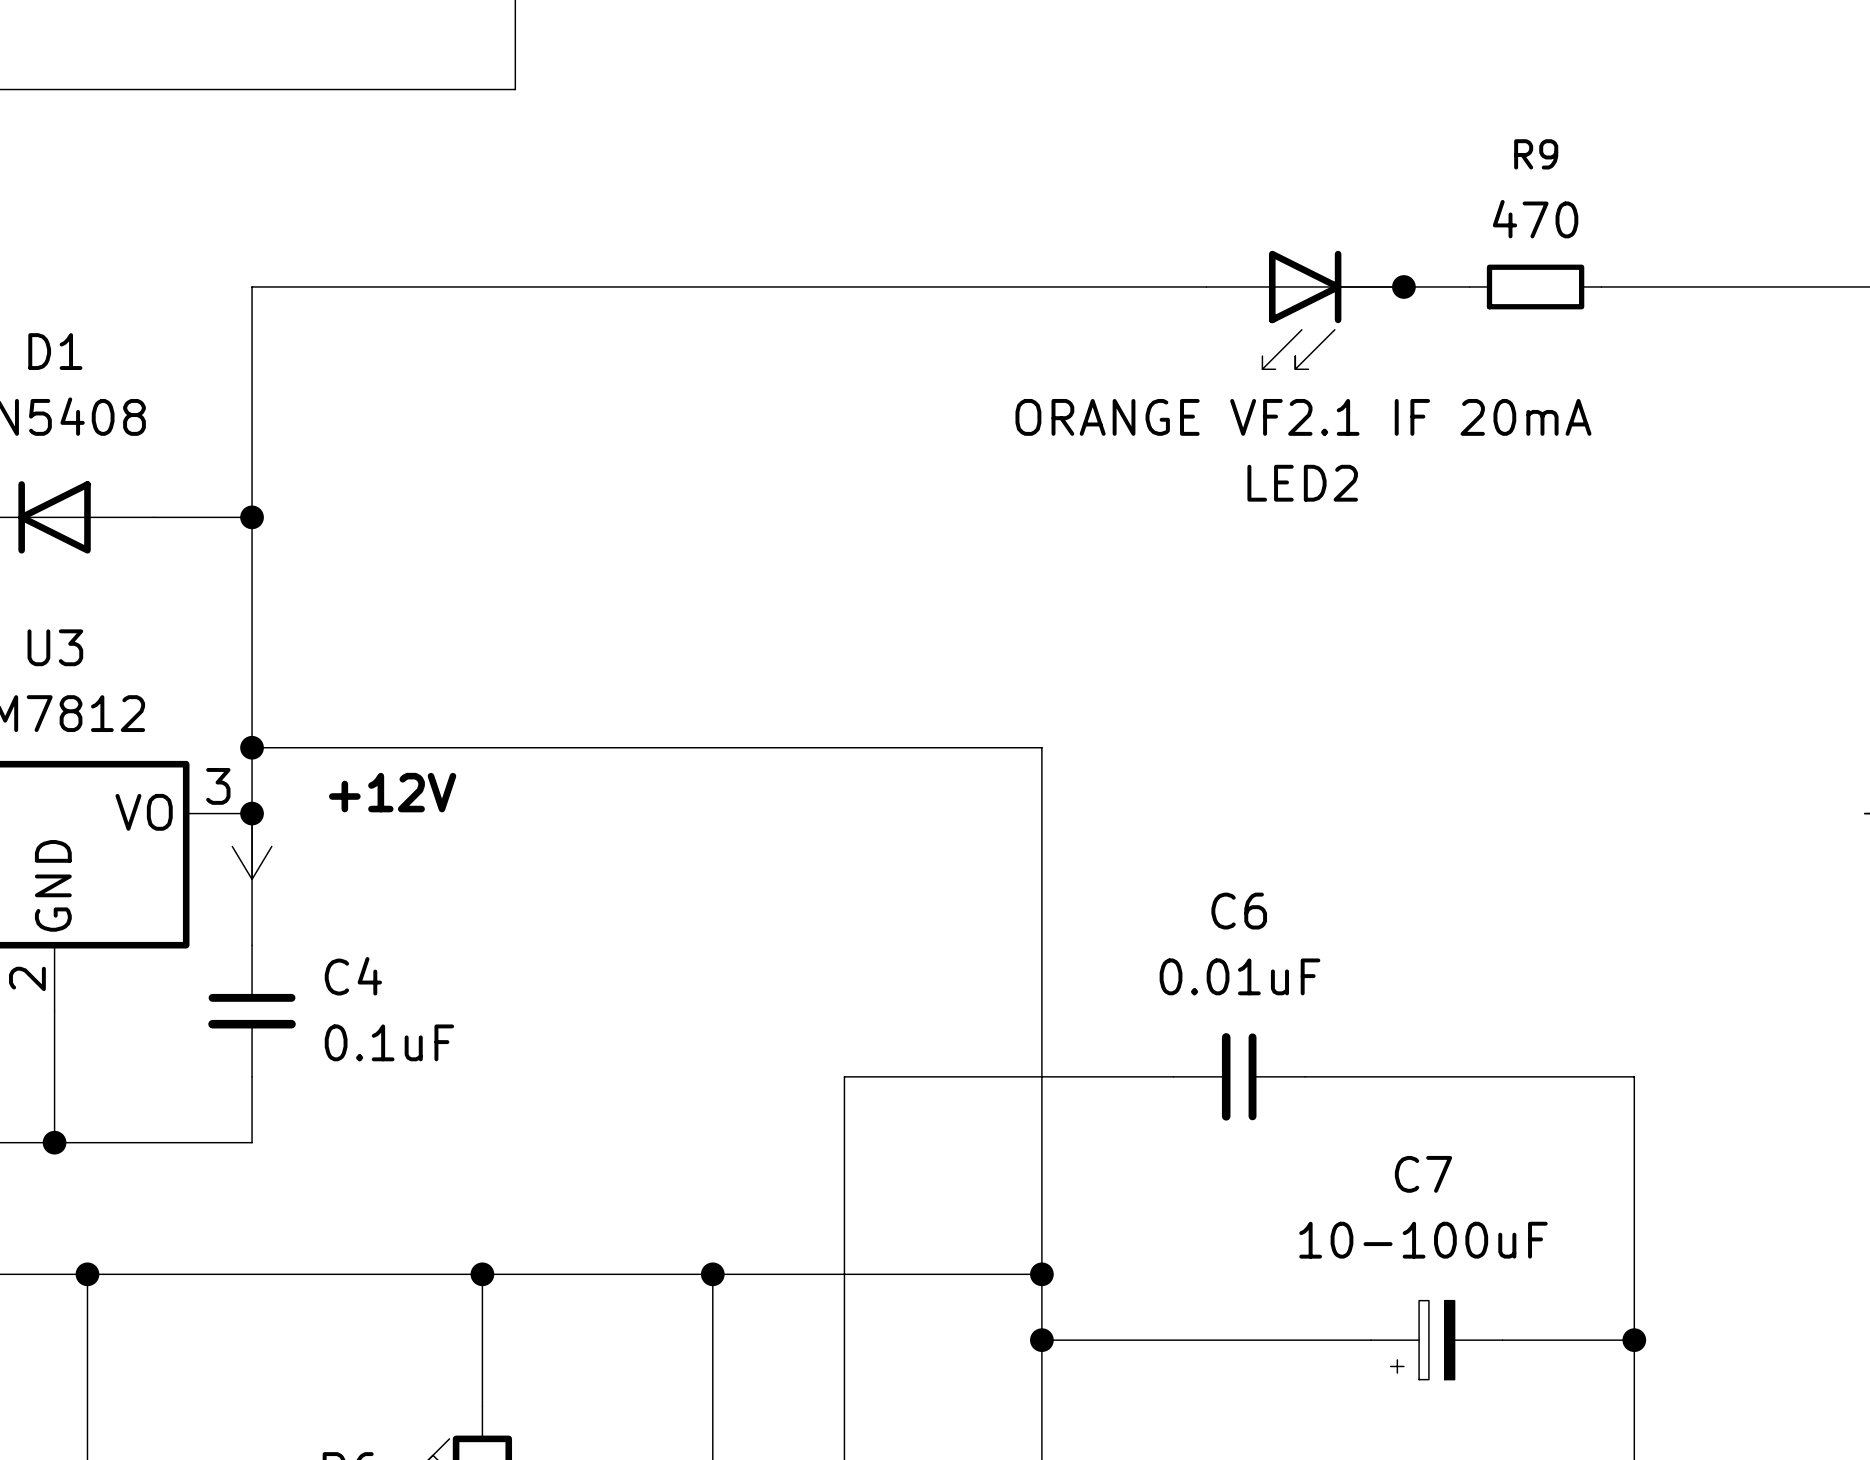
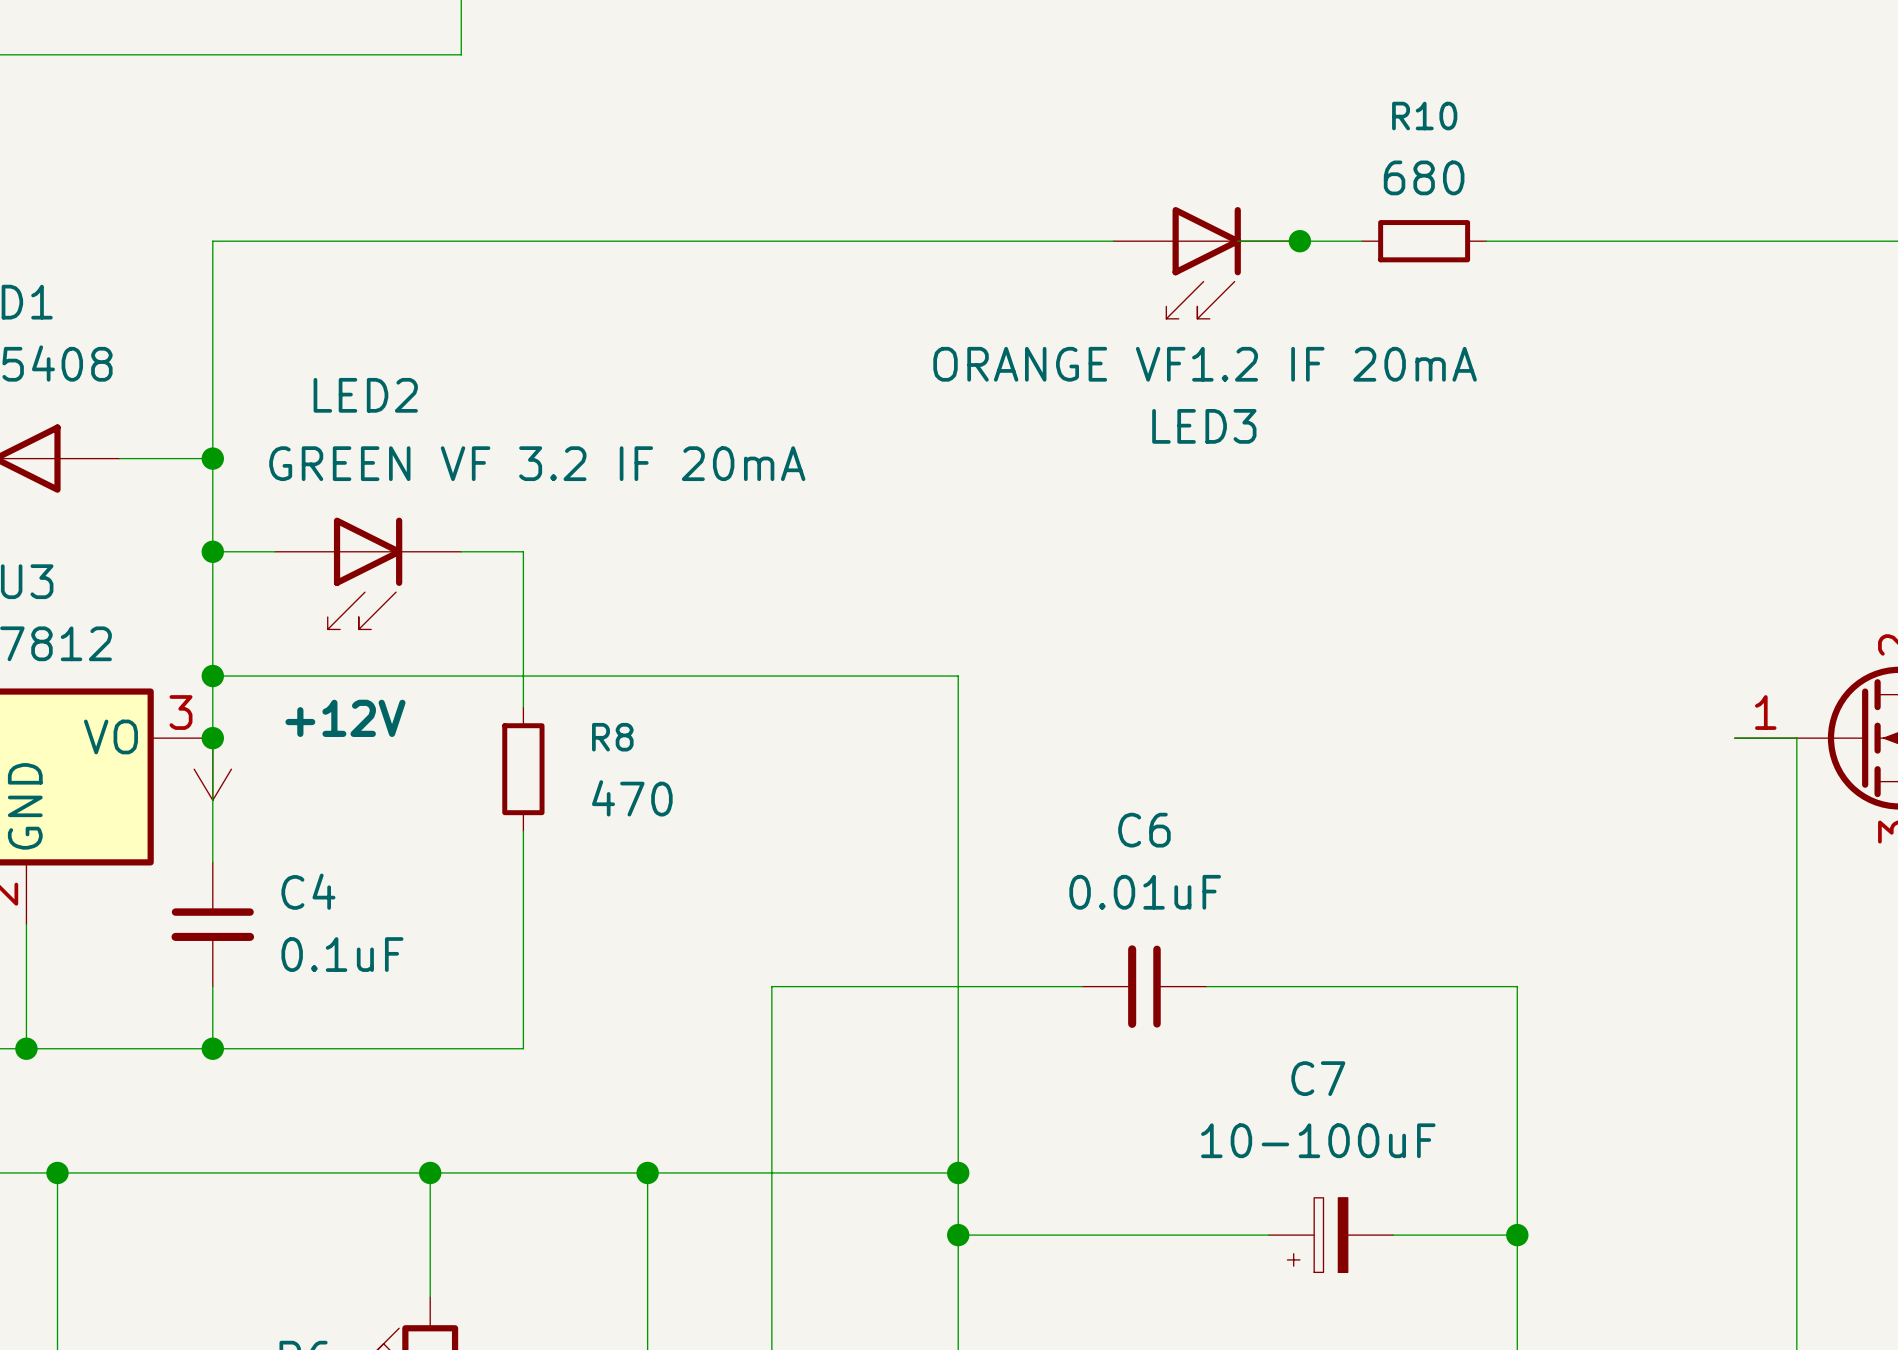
R9 name: R9 (1536, 154) -> R10 (1424, 116)
R9 value: 470 (1535, 219) -> 680 (1424, 177)
LED2 value: ORANGE VF2.1 IF 20mA (1303, 417) -> ORANGE VF1.2 IF 20mA (1205, 364)
LED2 name: LED2 (1302, 483) -> LED3 (1204, 426)
wire: none -> (212, 551) (274, 551)
junction: none -> (212, 551)
wire: none -> (461, 551) (523, 551) (523, 707)
LED2: none -> GREEN VF 3.2 IF 20mA (368, 573)
R8: none -> 470 (523, 769)
wire: none -> (523, 831) (523, 1048) (212, 1048)
junction: none -> (212, 1048)

